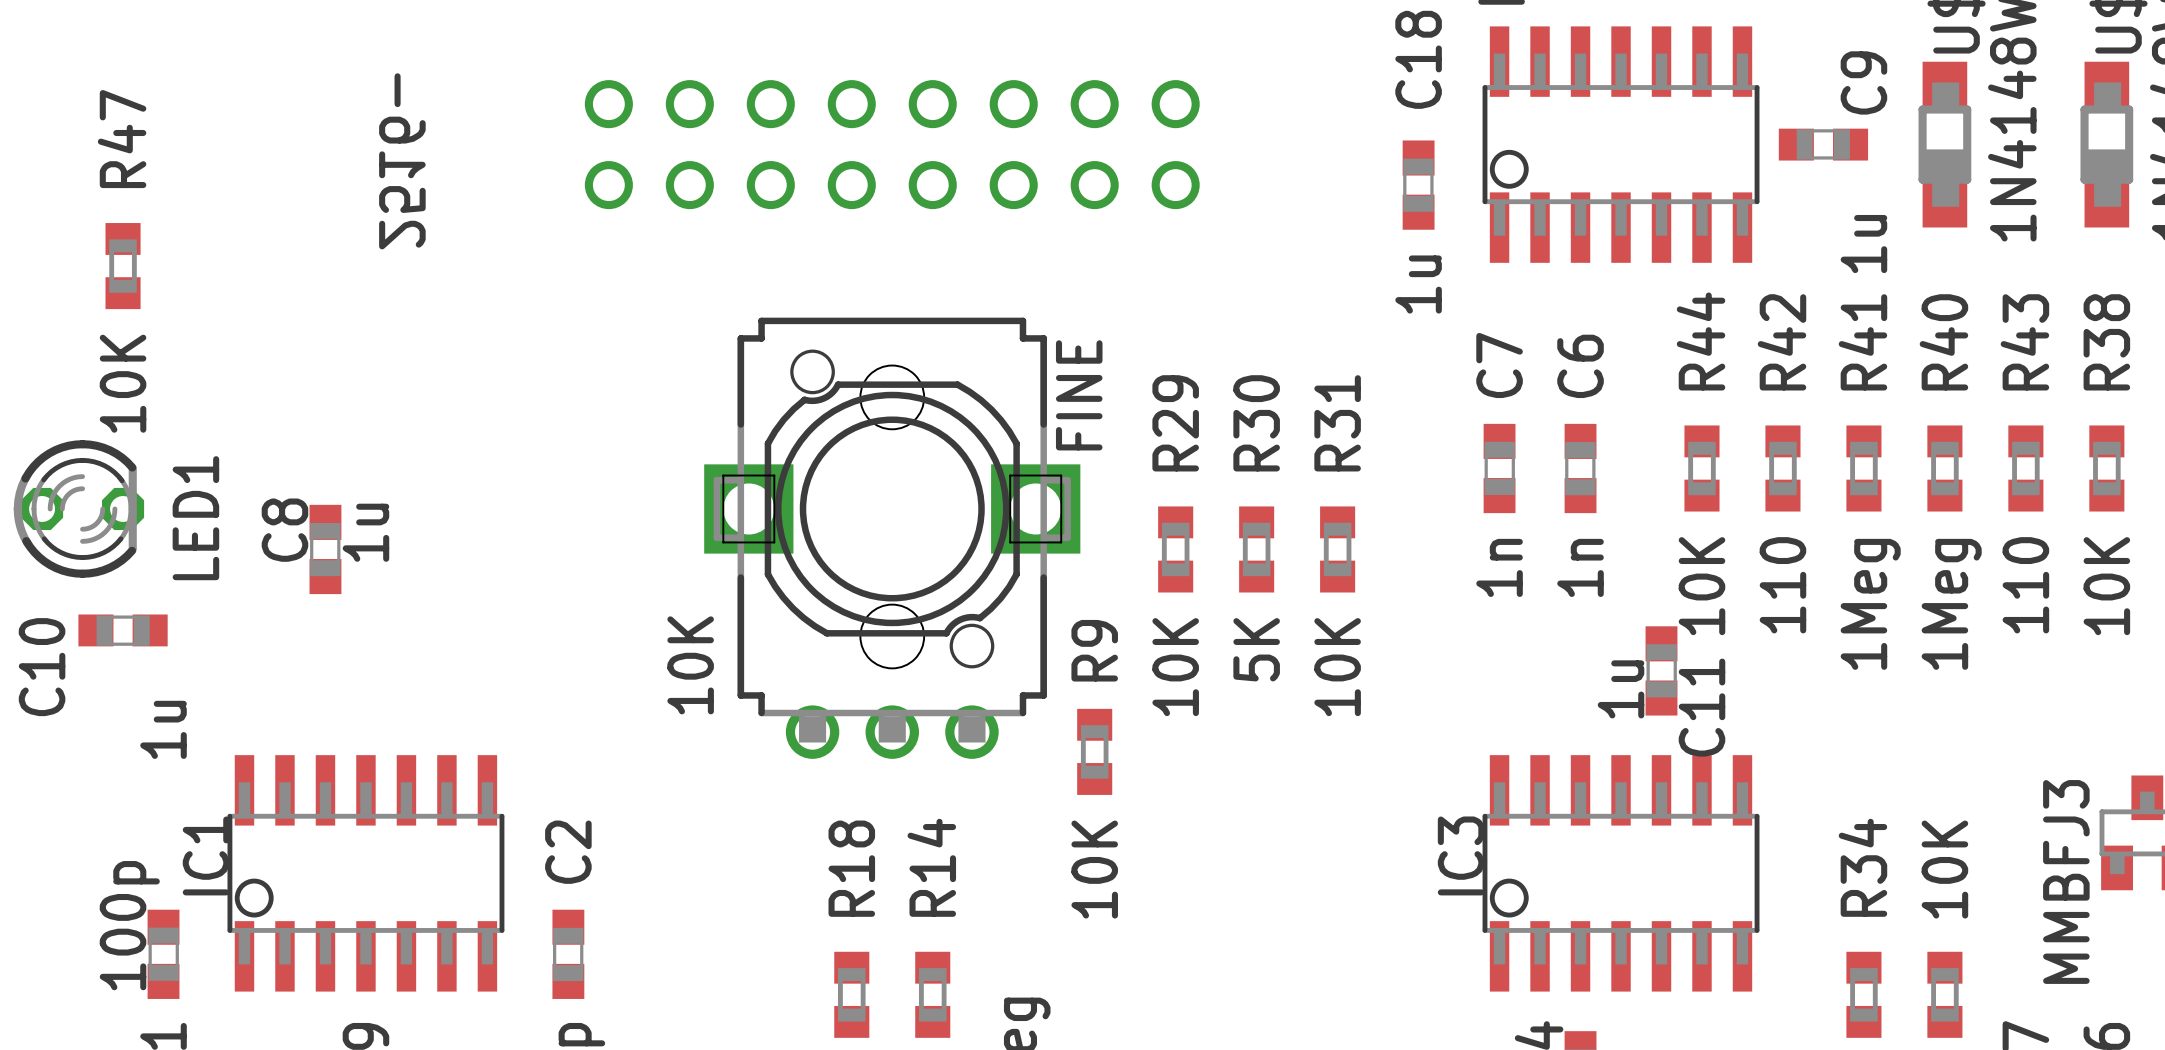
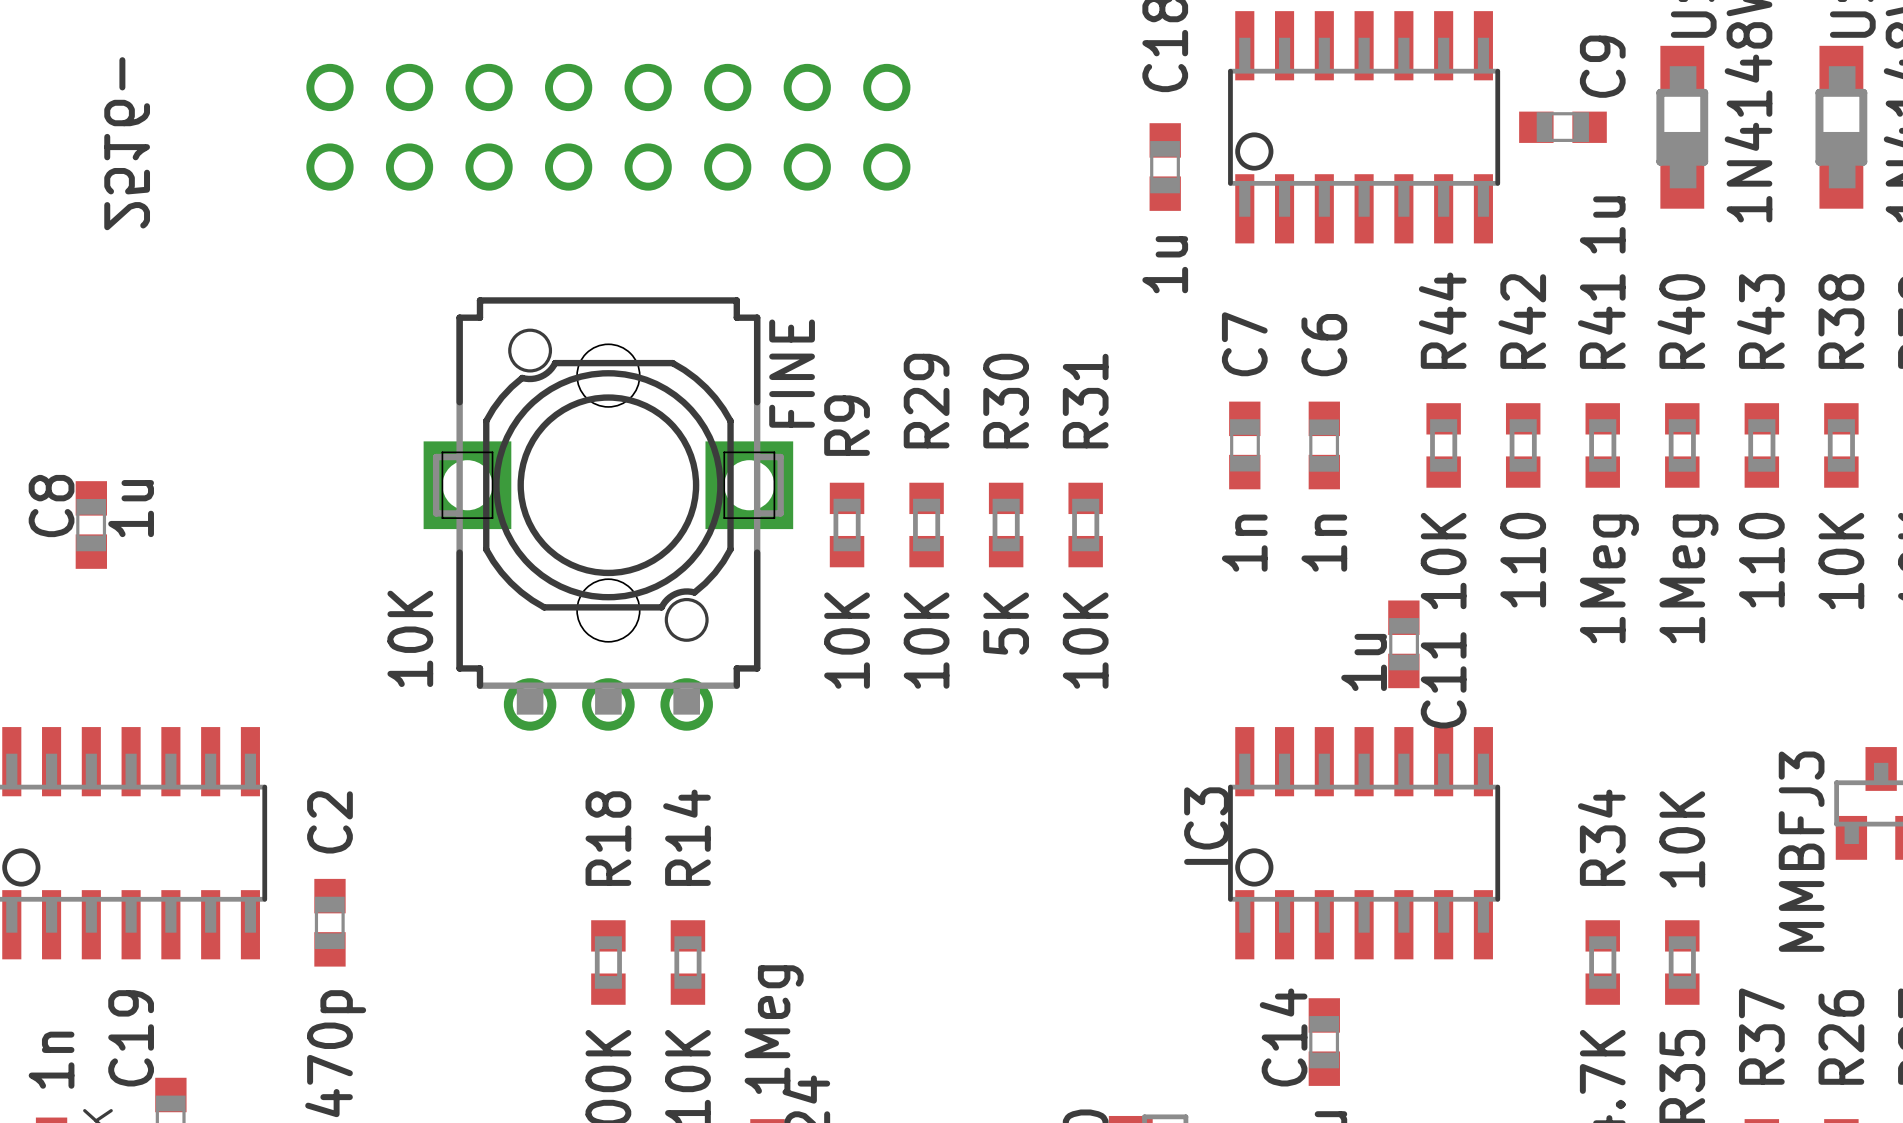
part position: (892, 144) -> (608, 127)
FINE position: (892, 538) -> (608, 513)
R9 position: (1094, 751) -> (847, 525)

